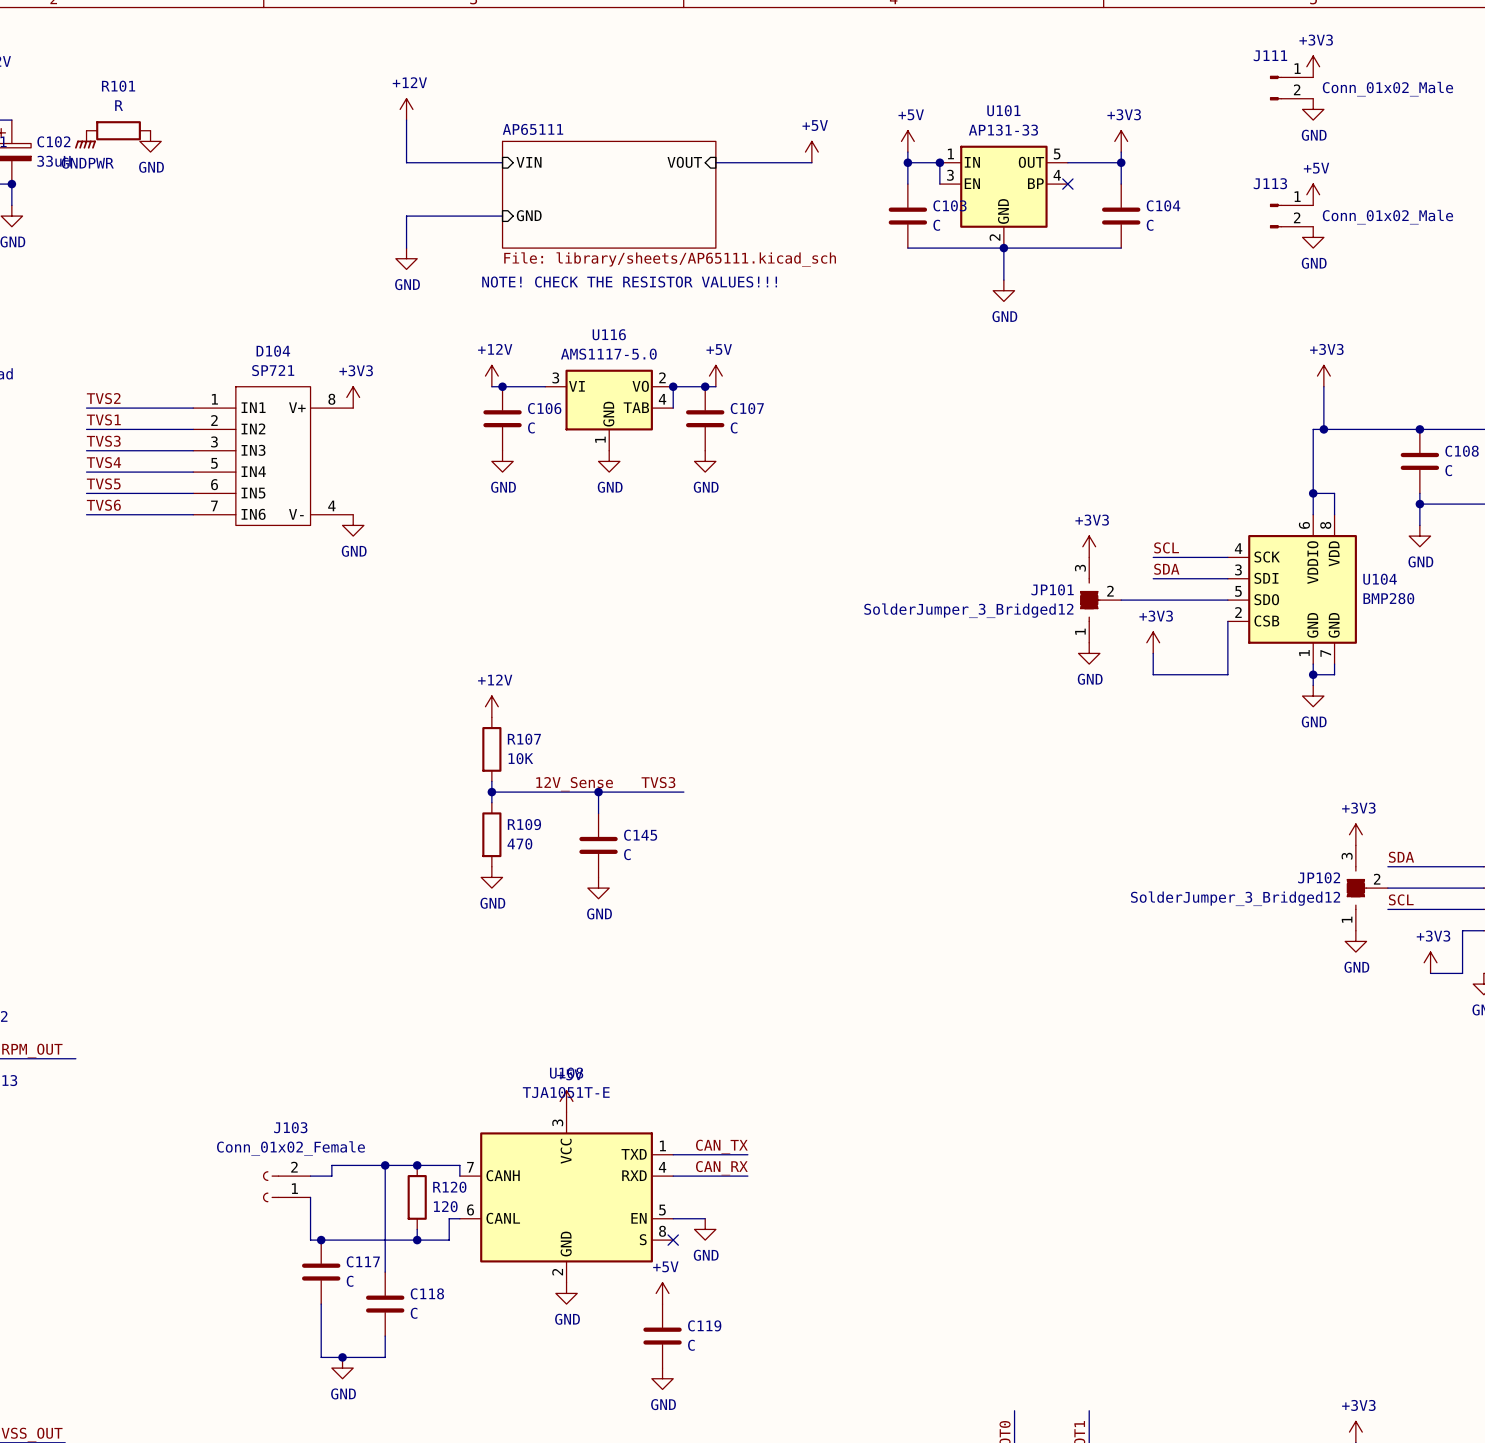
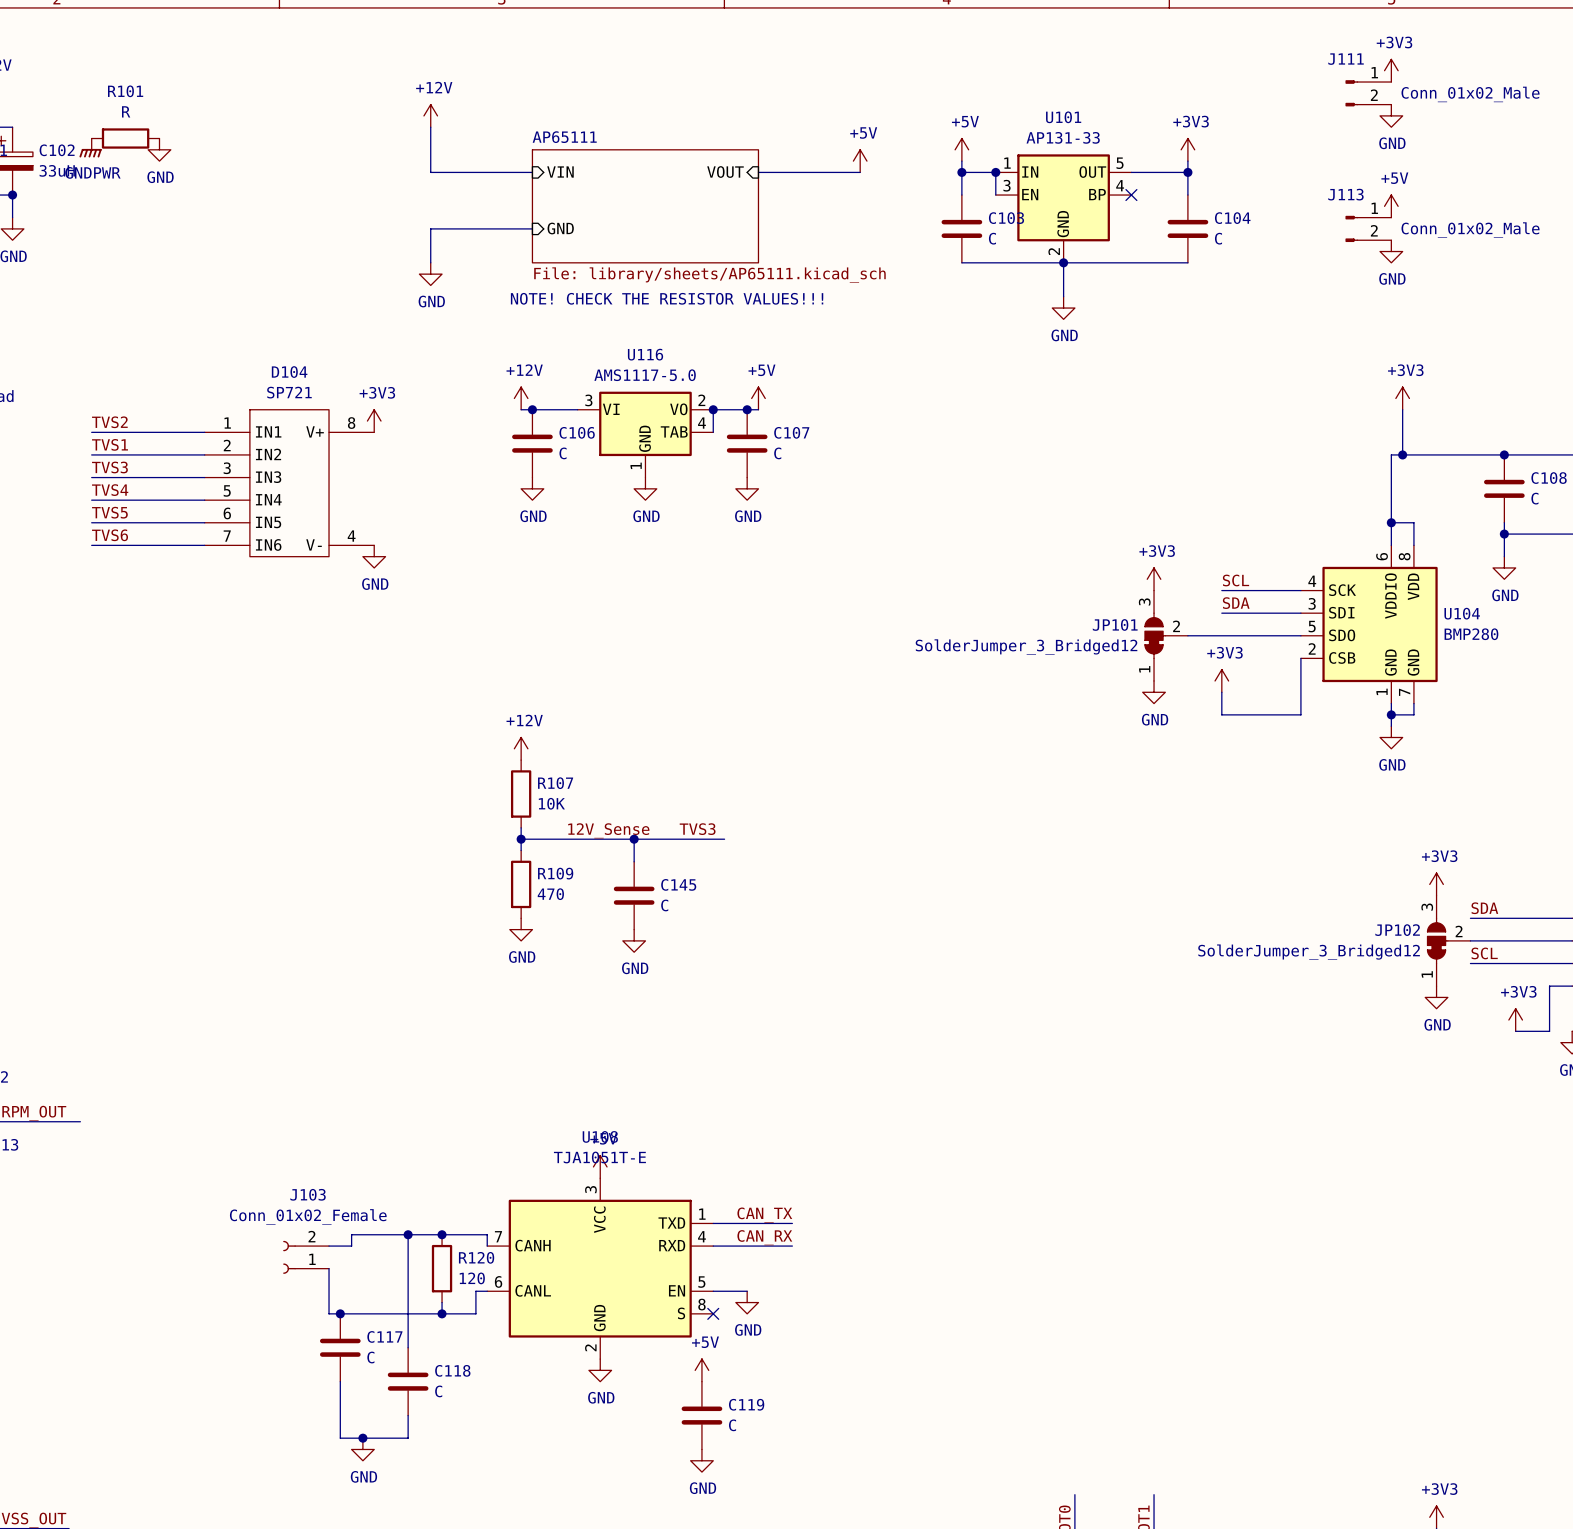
JP101 symbol: [1080, 557, 1122, 643] -> [1144, 590, 1188, 681]
JP102 symbol: [1347, 845, 1388, 931] -> [1427, 895, 1471, 987]
J103 symbol: [262, 1171, 311, 1203] -> [283, 1240, 330, 1274]

